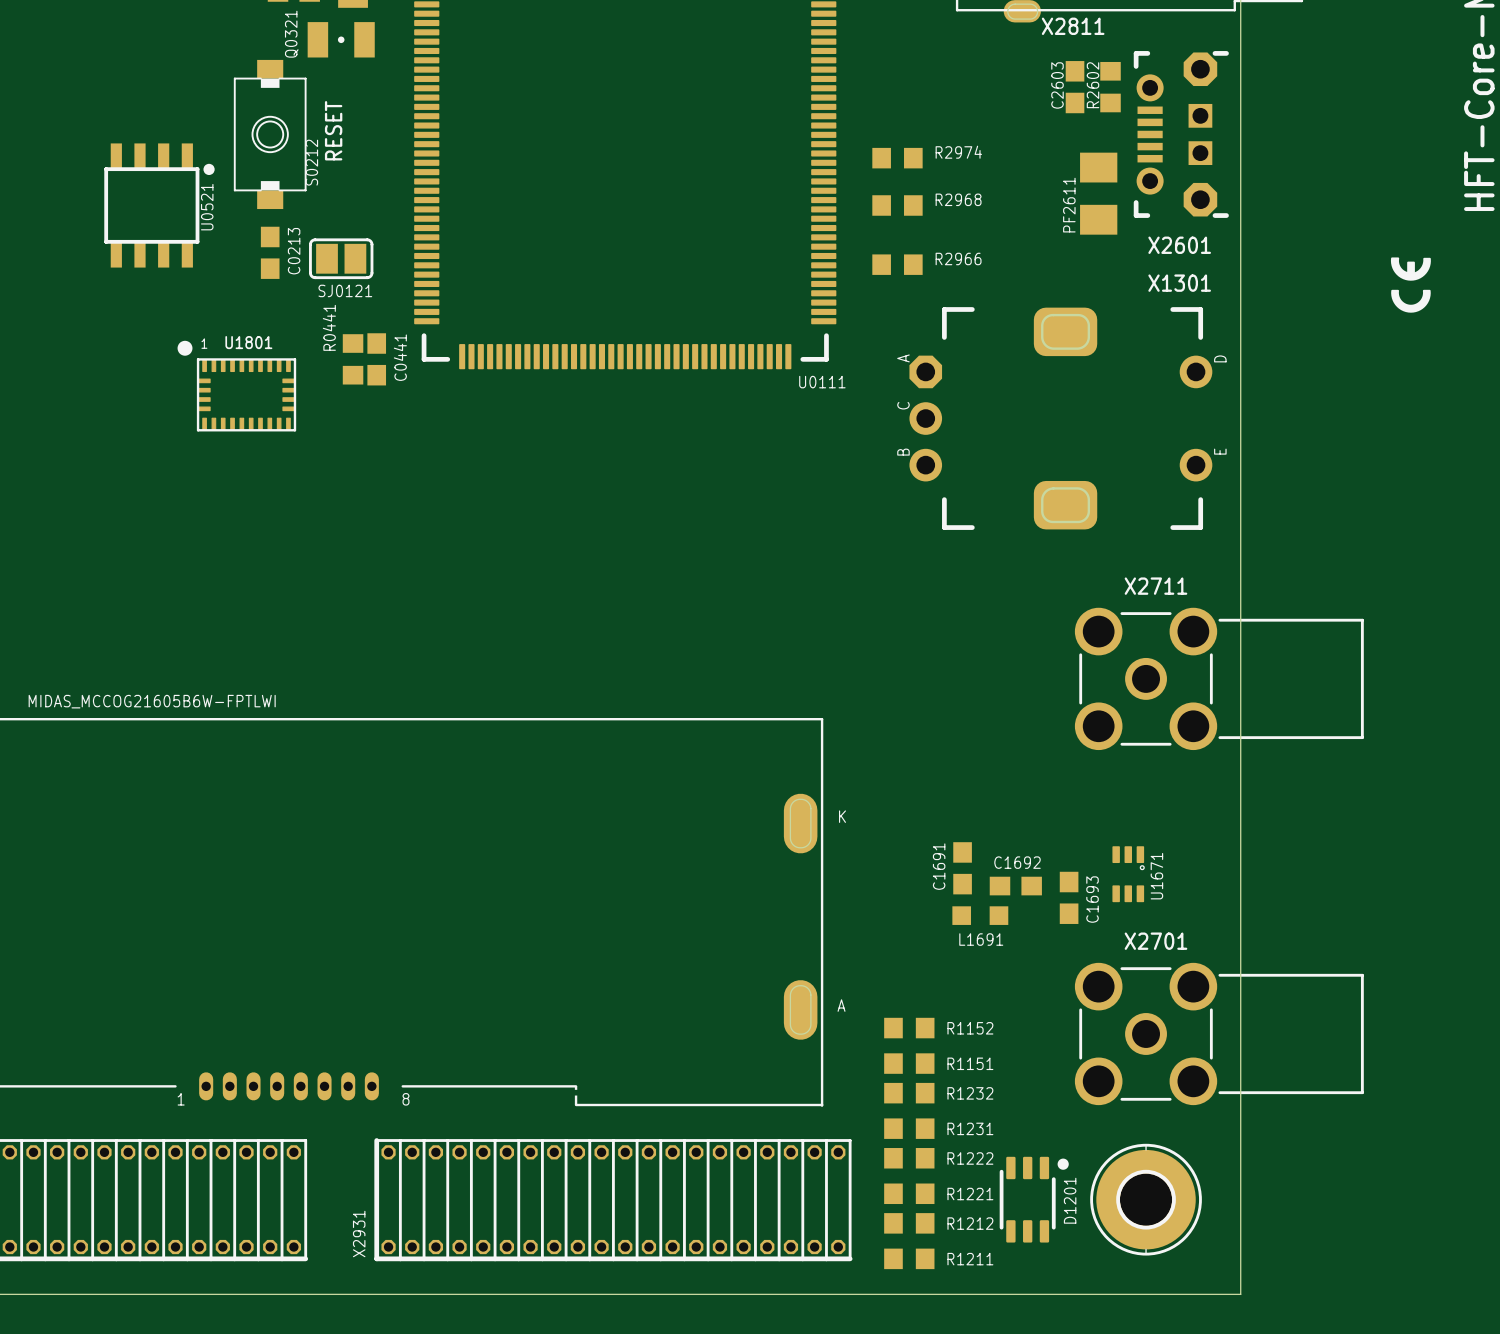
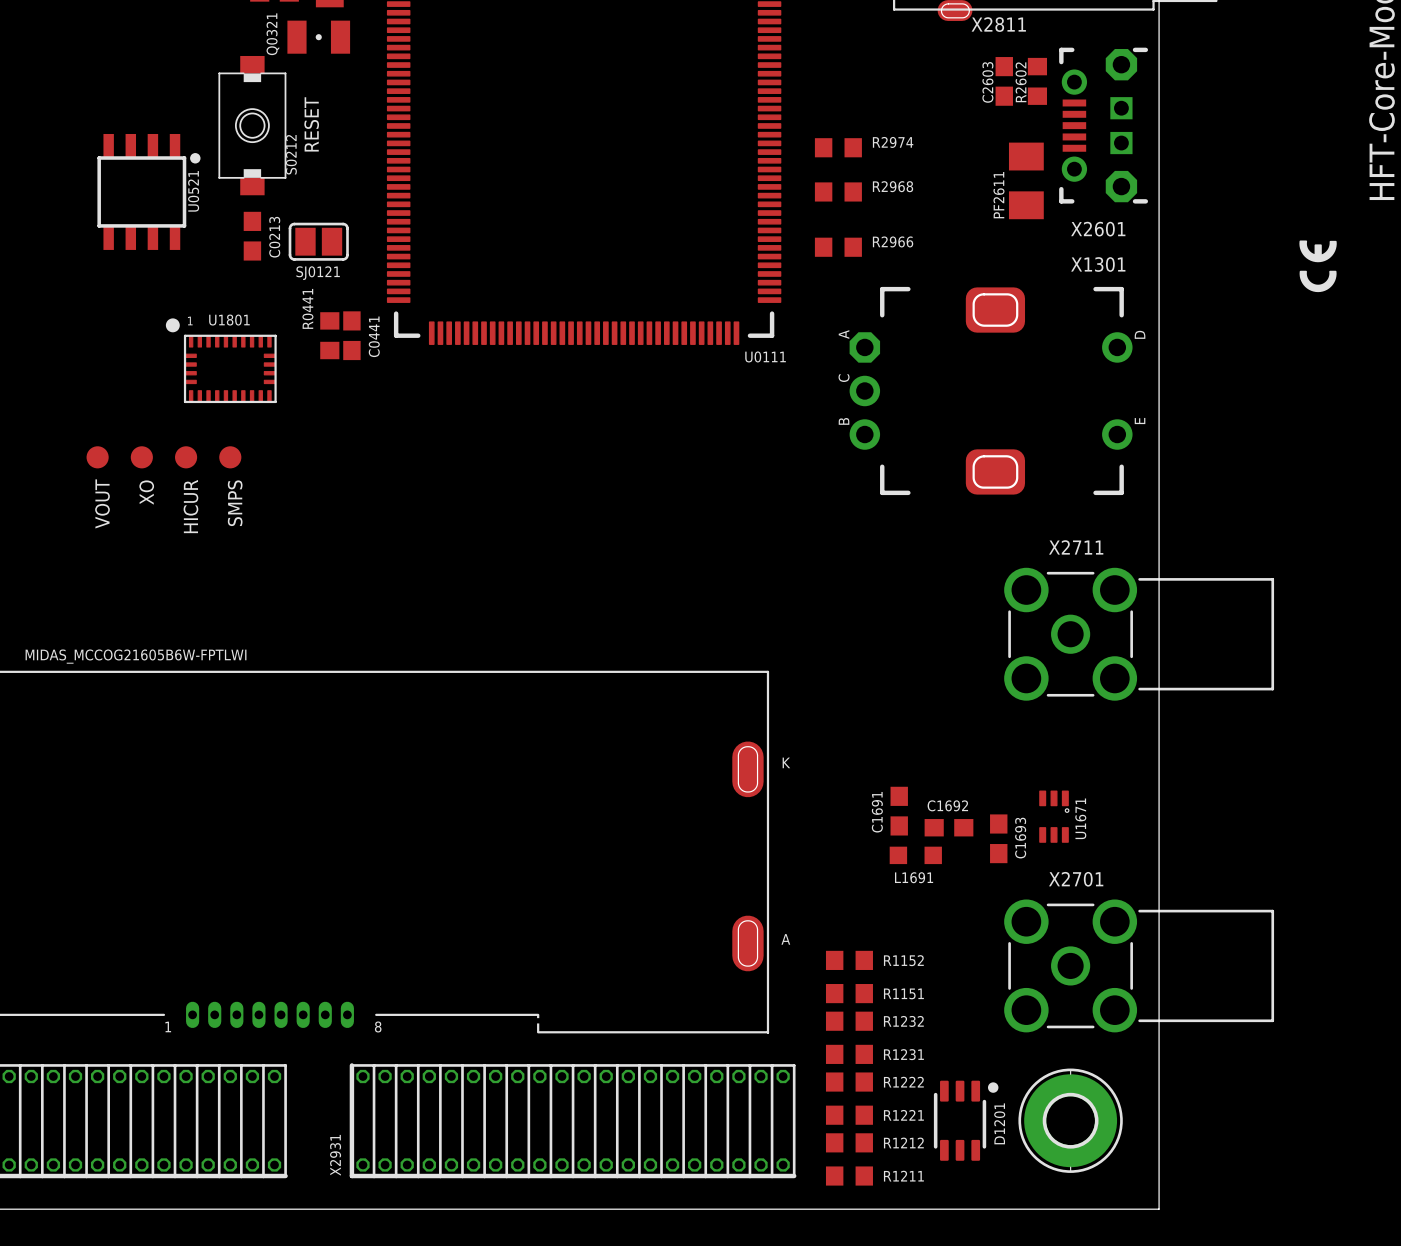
part: none -> (97, 457)
part: none -> (141, 457)
part: none -> (186, 457)
part: none -> (230, 457)
text: none -> XO (146, 492)
text: none -> VOUT (102, 503)
text: none -> SMPS (235, 503)
text: none -> HICUR (190, 506)

